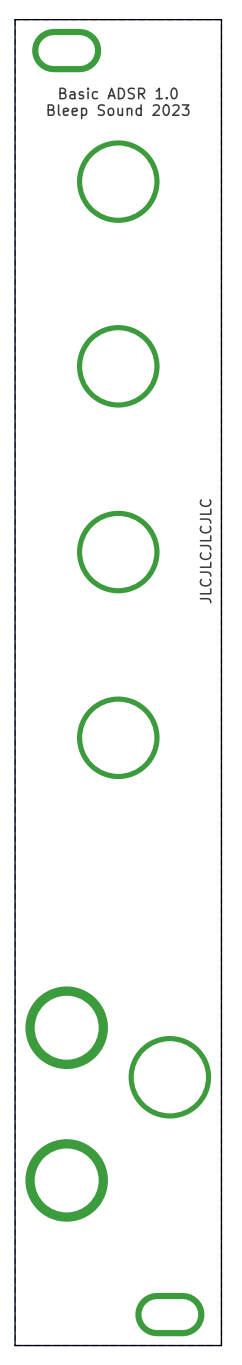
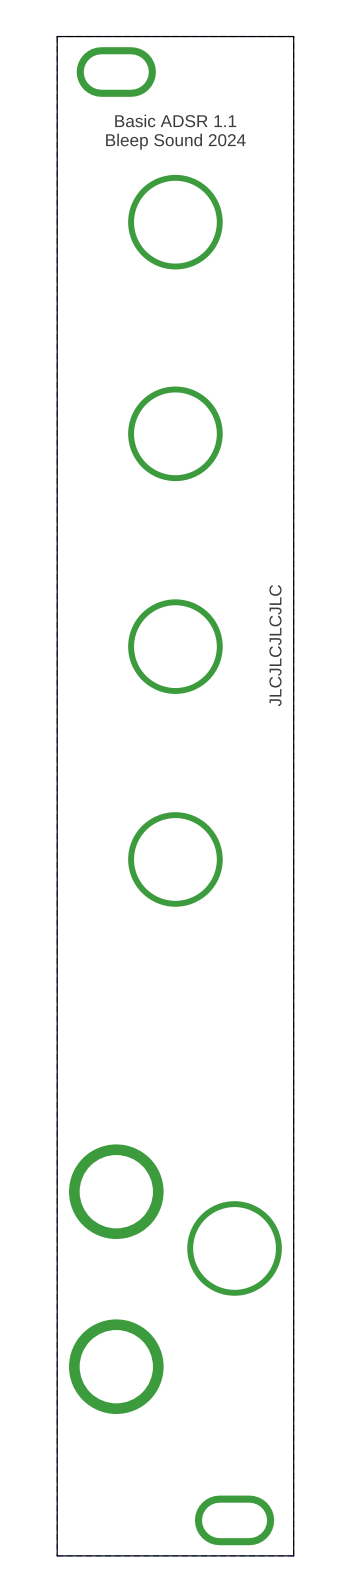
text: Basic ADSR 1.0 (118, 93) -> Basic ADSR 1.1 (175, 120)
text: Bleep Sound 2023 (118, 111) -> Bleep Sound 2024 (175, 141)

